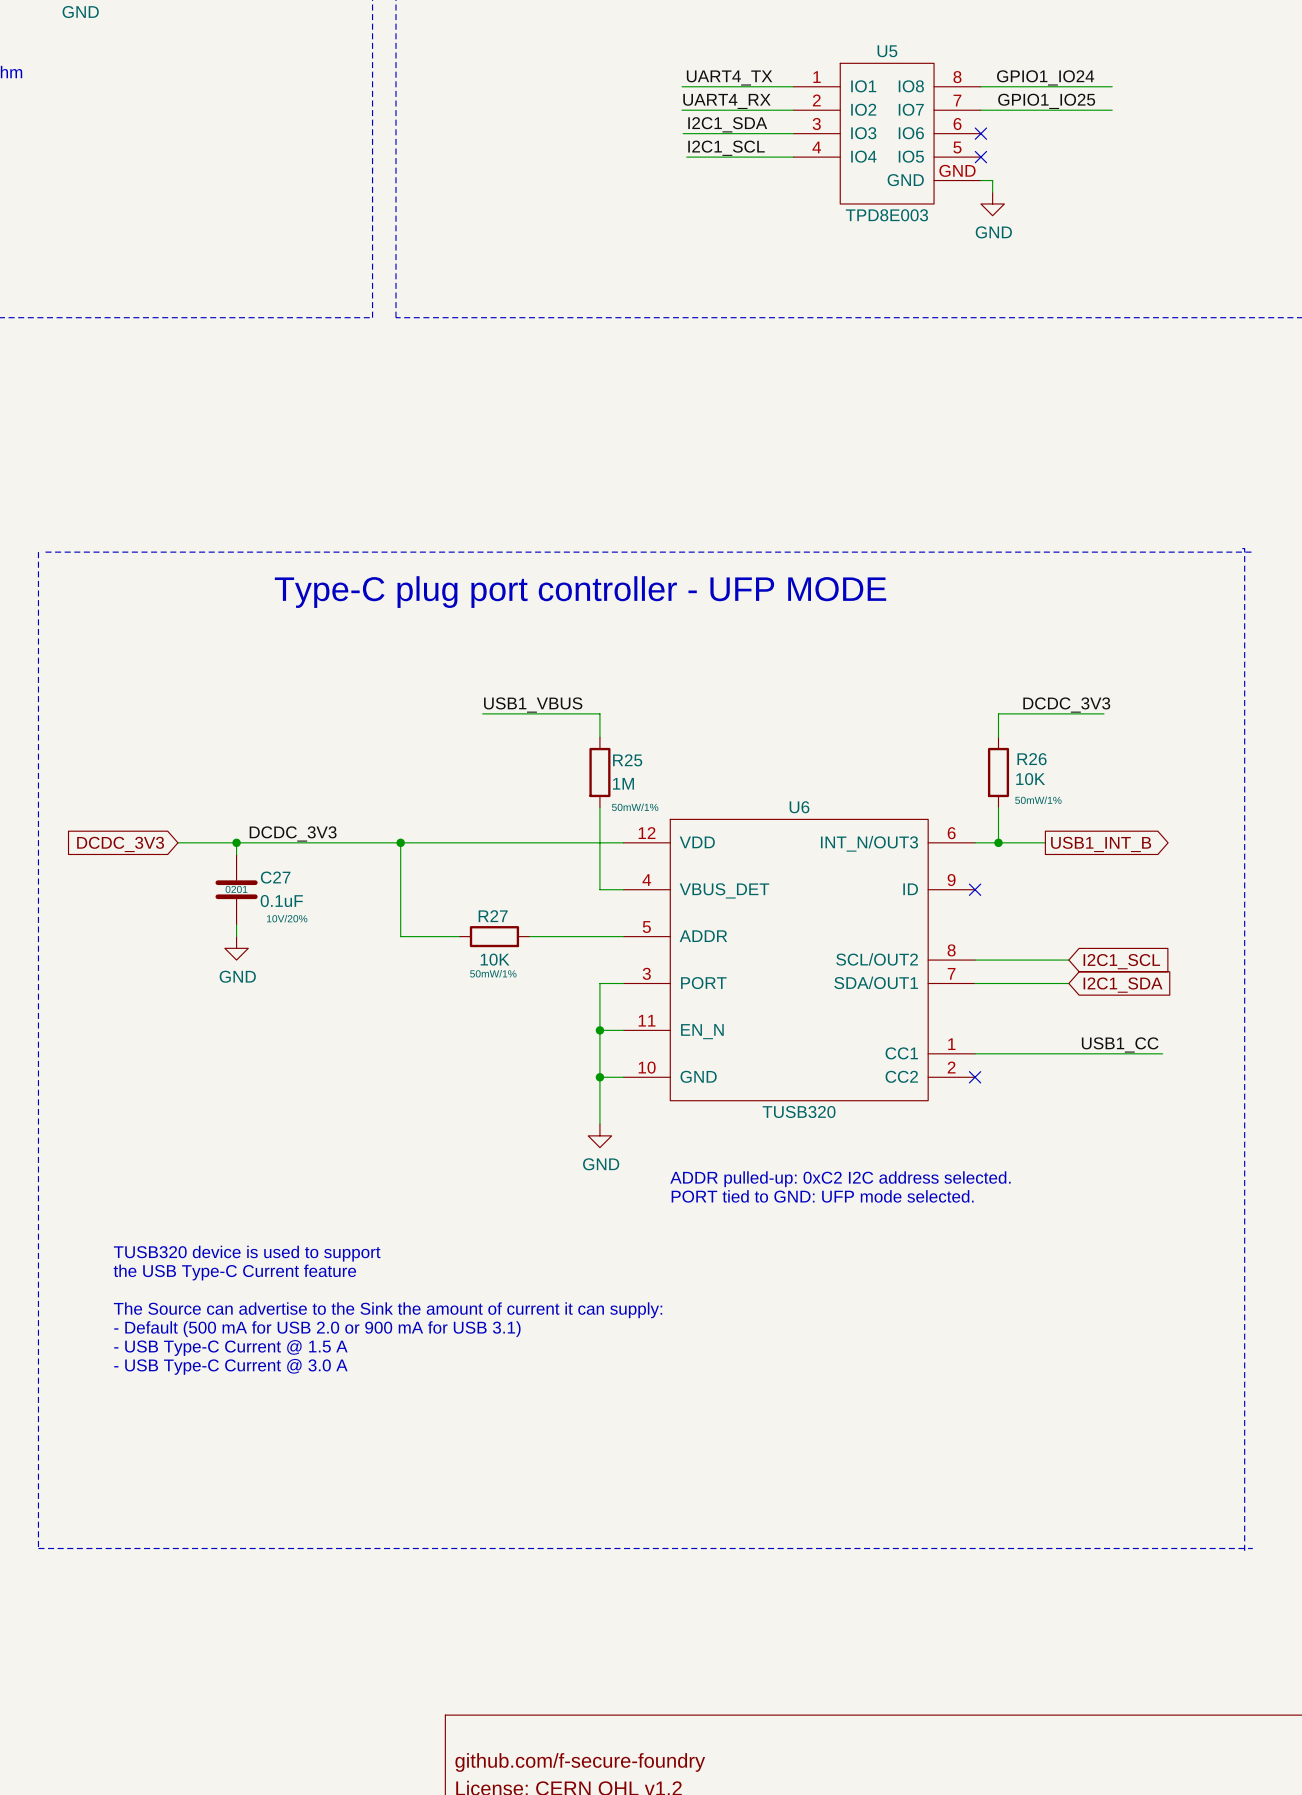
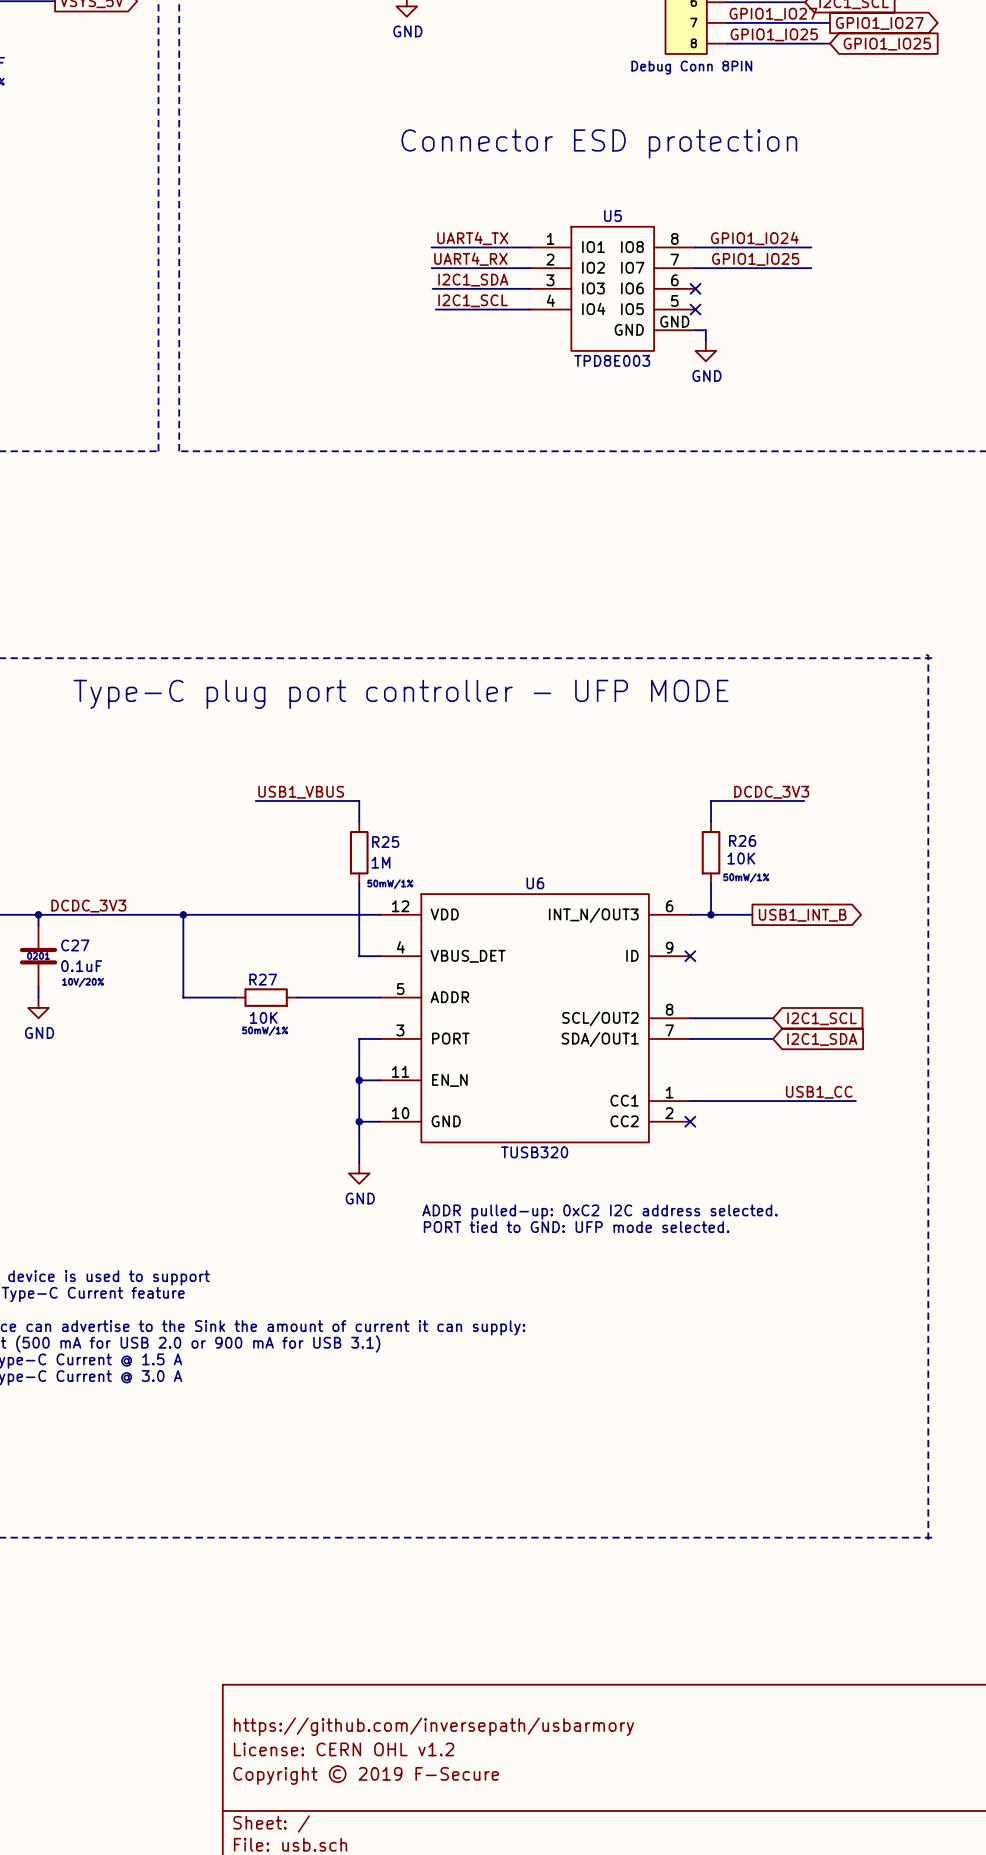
title block: github.com/f-secure-foundry (580, 1762) -> https://github.com/inversepath/usbarmory (433, 1726)

